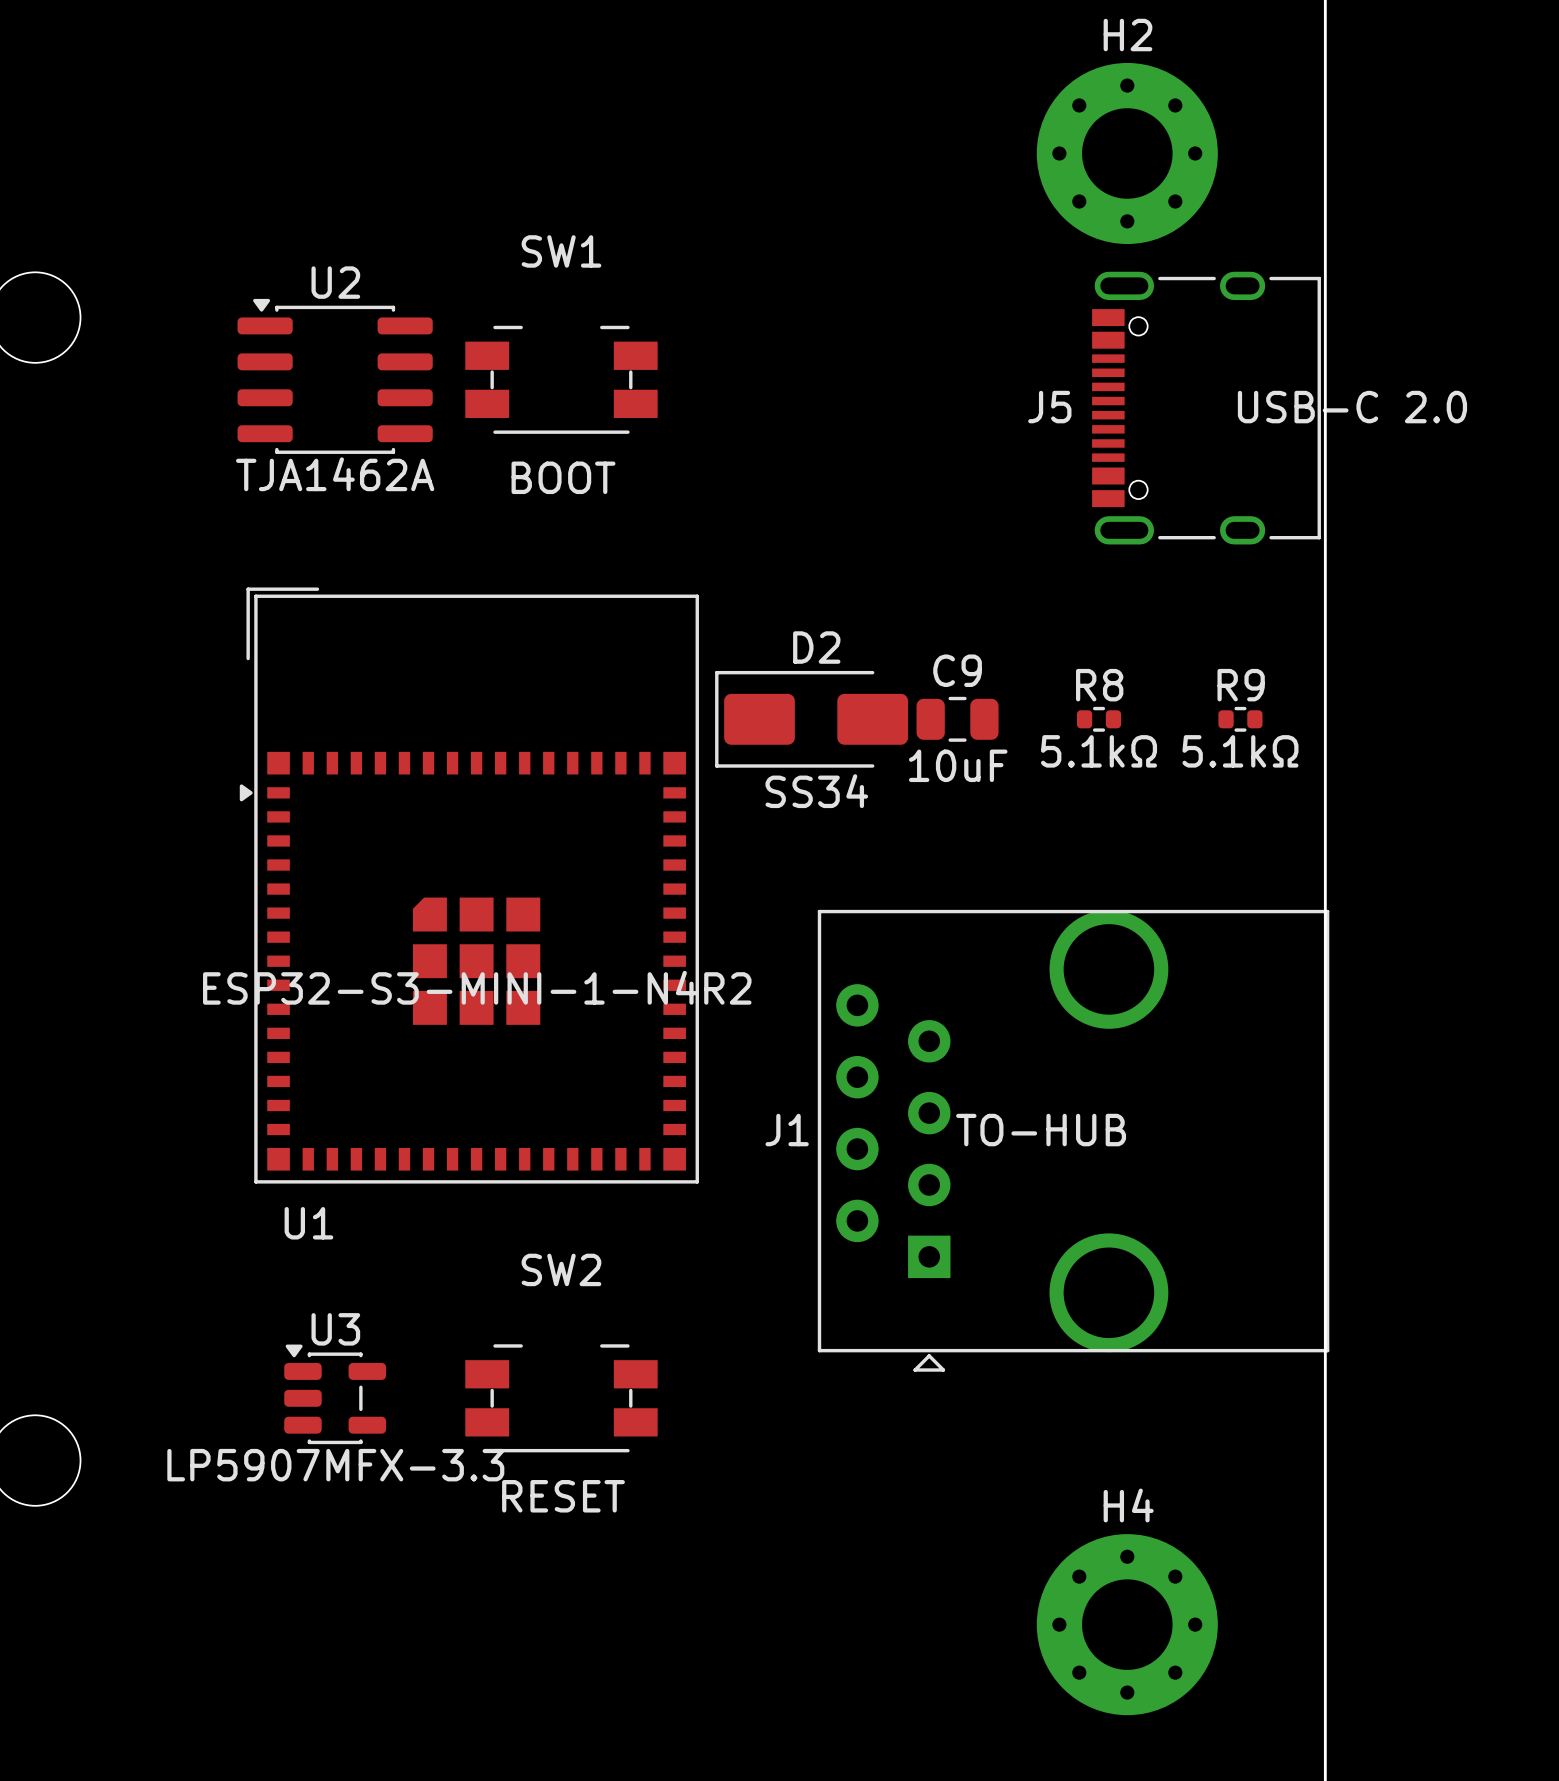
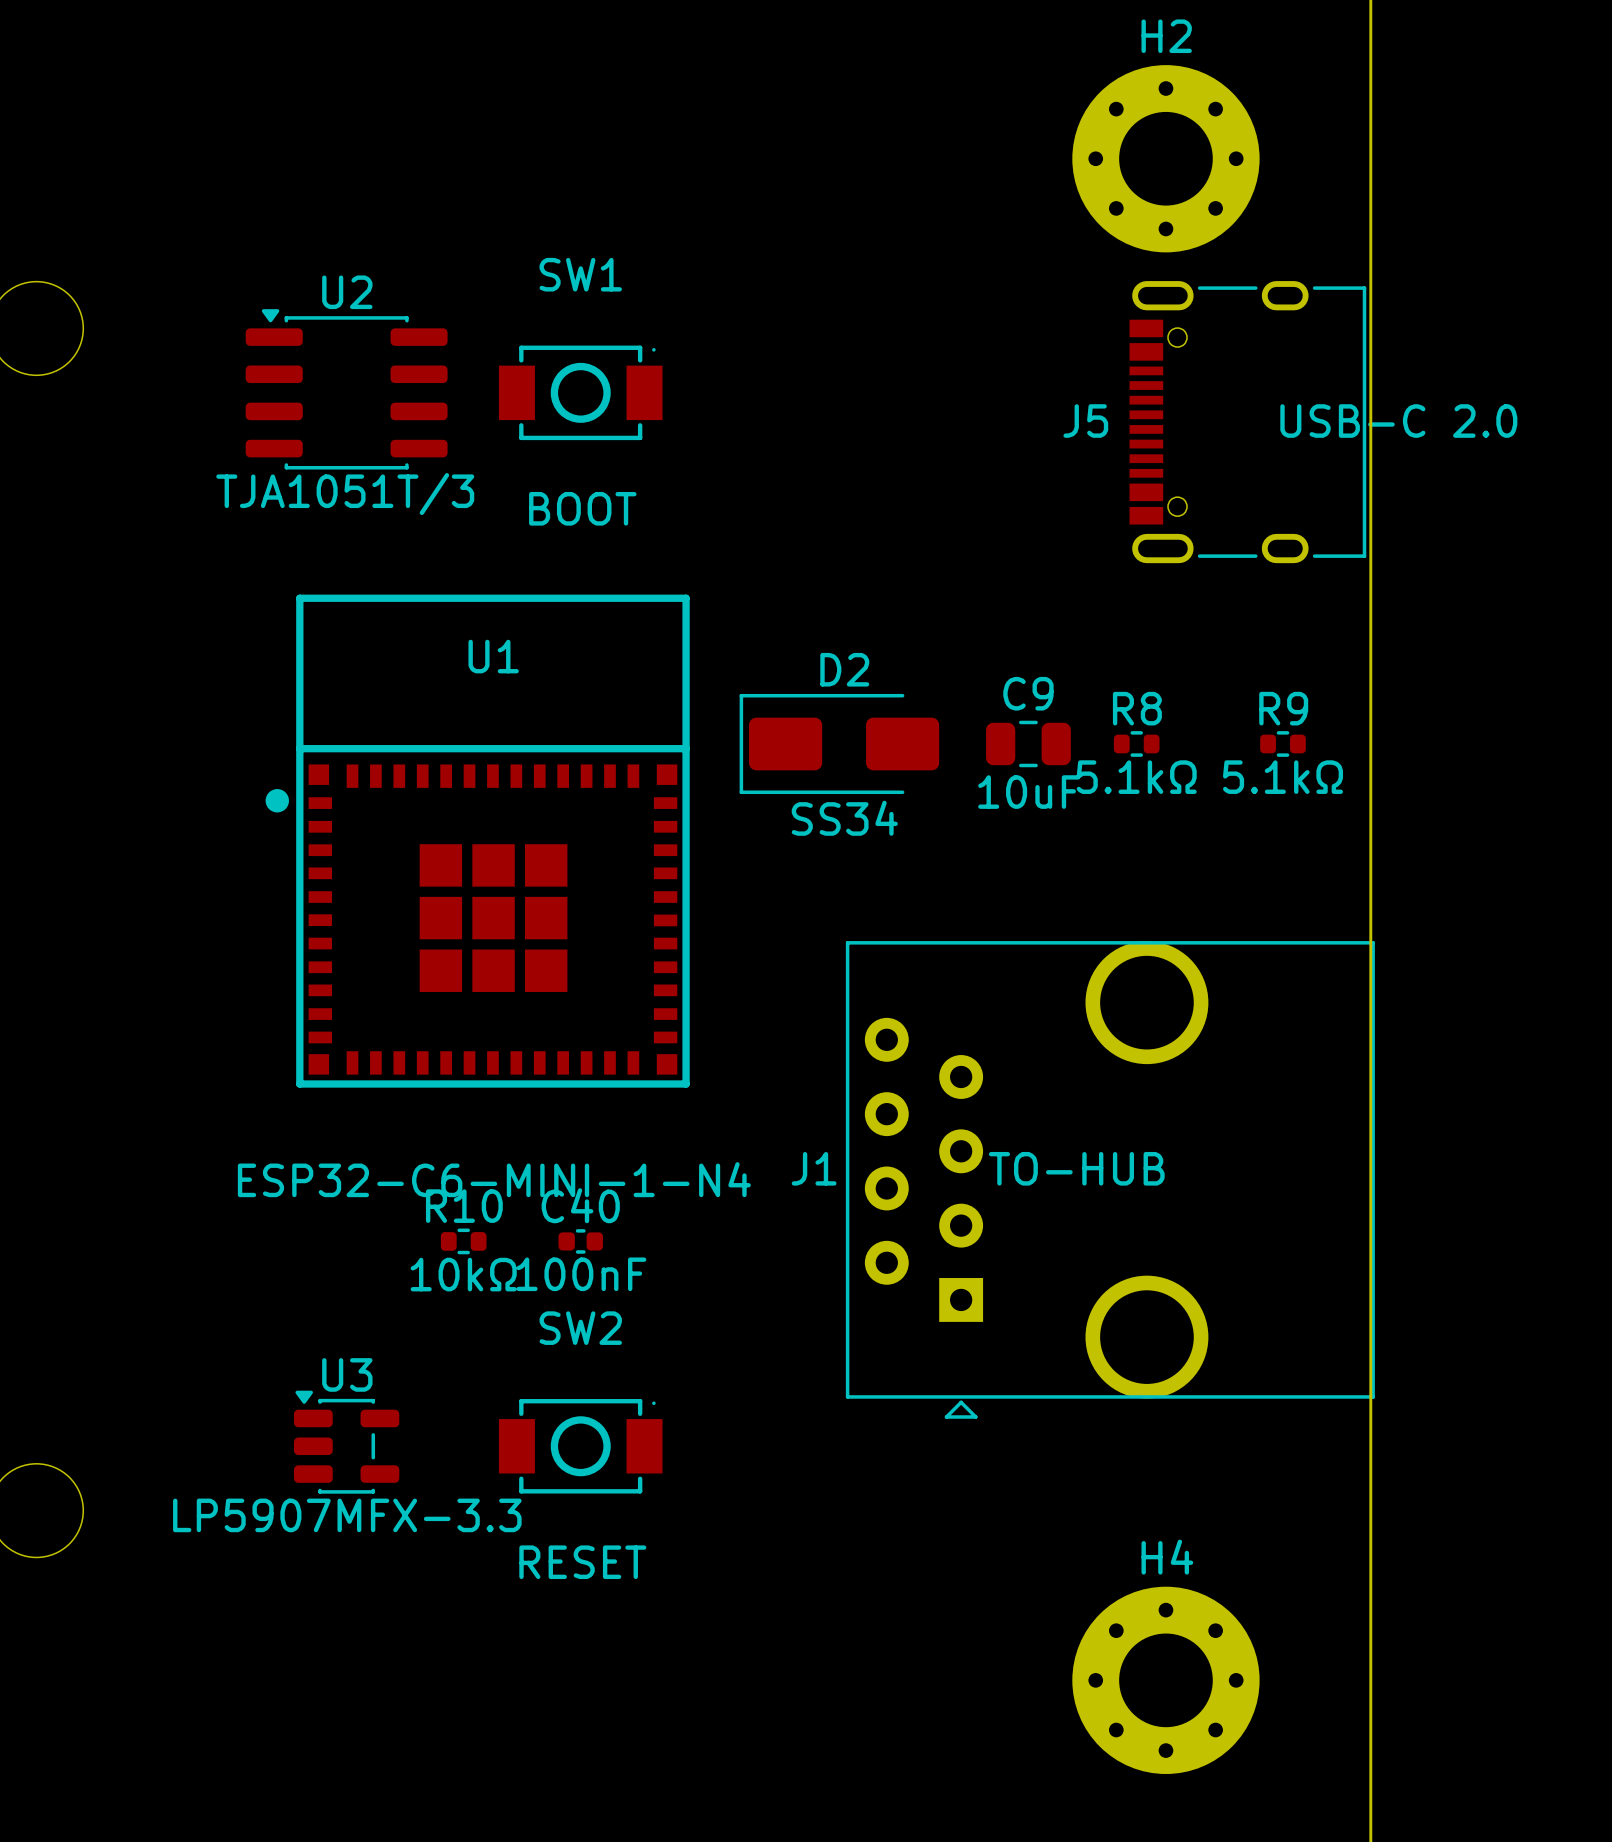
SW1 footprint: [465, 325, 658, 434] -> [498, 345, 663, 441]
U2 value: TJA1462A (335, 474) -> TJA1051T/3 (345, 494)
U1 footprint: [239, 587, 699, 1184] -> [265, 594, 690, 1088]
C9 position: (957, 719) -> (1028, 743)
U1 value: ESP32-S3-MINI-1-N4R2 (477, 987) -> ESP32-C6-MINI-1-N4 (494, 1179)
R10: none -> 10kΩ (463, 1241)
C40: none -> 100nF (580, 1241)
U1 name position: U1 (308, 1223) -> U1 (493, 656)
SW2 footprint: [465, 1344, 658, 1453] -> [498, 1399, 663, 1494]

